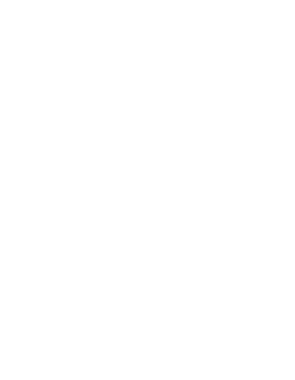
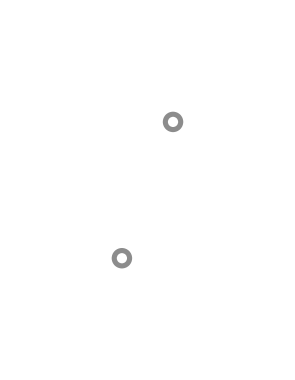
via: none -> (173, 121)
via: none -> (121, 258)

